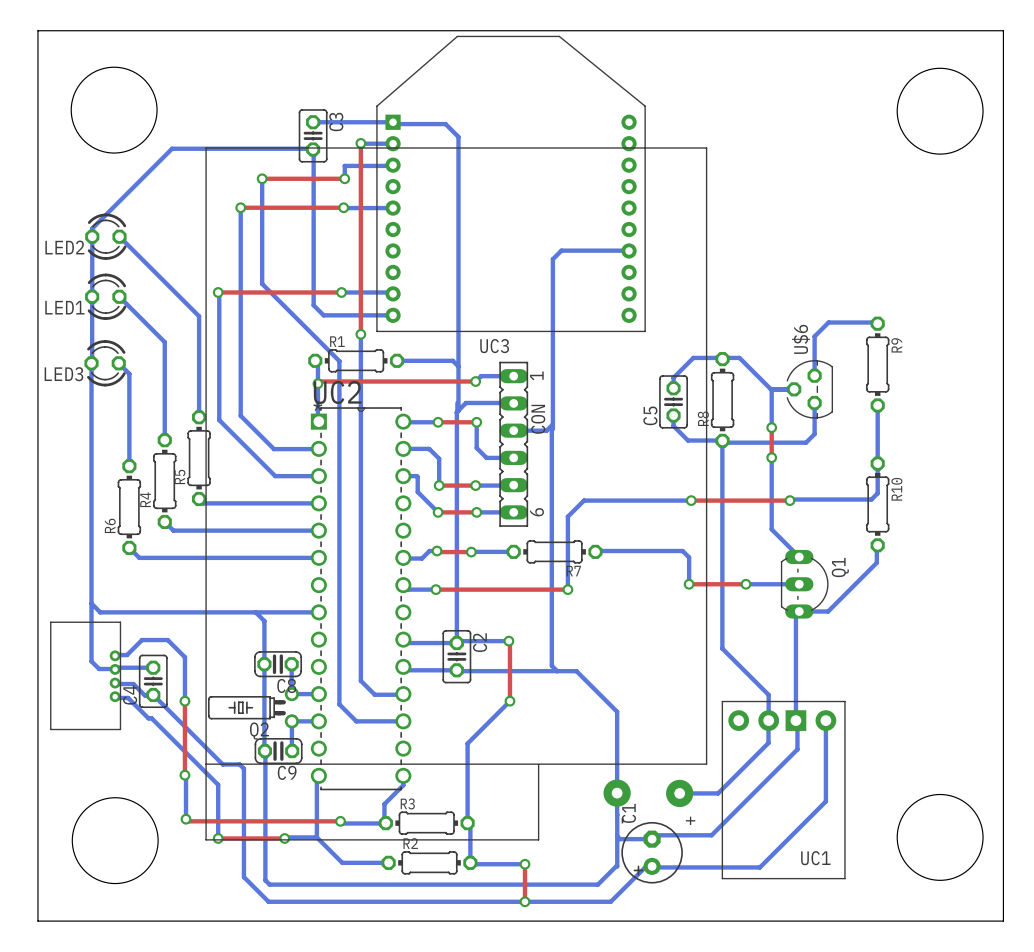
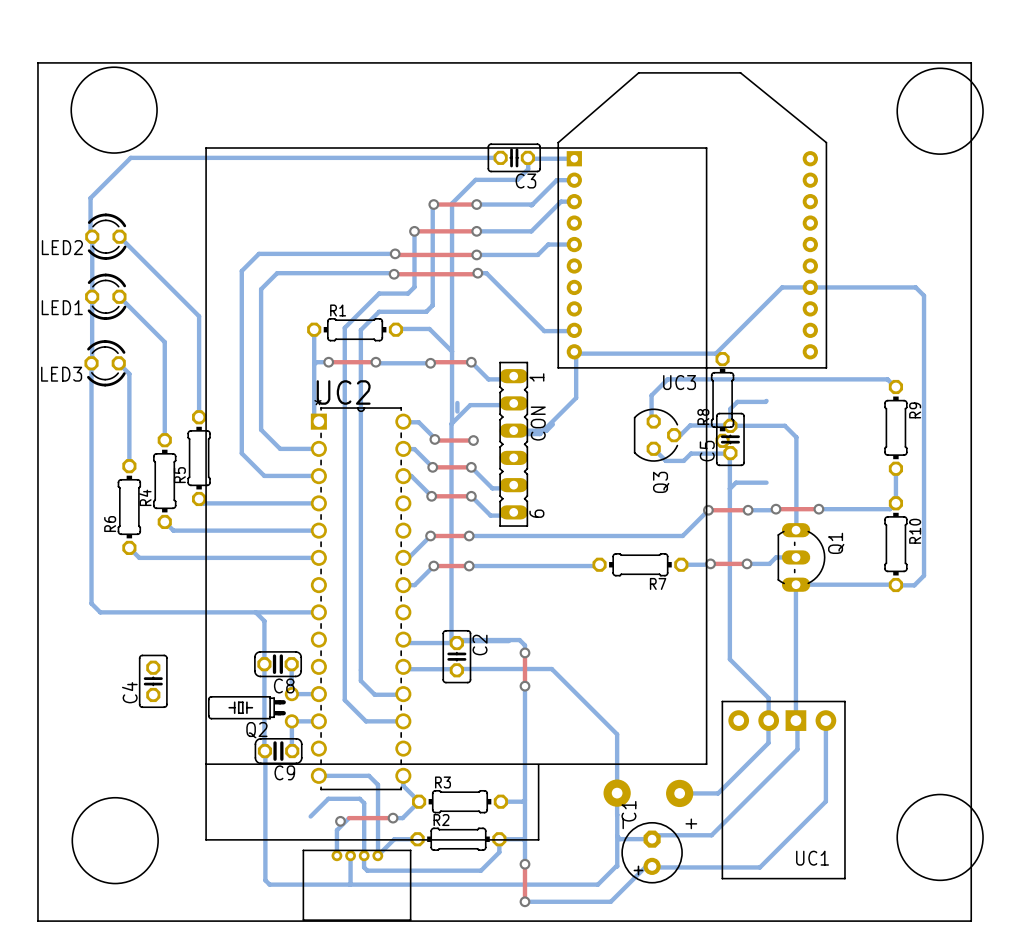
board edge: (37, 62) (37, 30) (1003, 30) (1003, 921) (971, 921) -> (37, 62) (971, 62) (971, 921)
bottom track: (313, 122) (445, 124) (458, 136) (458, 411) (456, 412) -> none
C3 rotation: 0° (313, 135) -> 90° clockwise (514, 157)
C3 position: (313, 135) -> (514, 157)
bottom track: (360, 143) (393, 143) -> none
top track: (360, 143) (360, 334) -> none
via: (360, 143) -> none
bottom track: (307, 148) (313, 155) (313, 305) (323, 315) (393, 315) -> none
bottom track: (313, 149) (172, 148) (92, 228) (92, 236) -> (500, 157) (130, 157) (90, 198) (90, 234) (92, 236)
bottom track: none -> (527, 158) (574, 158)
bottom track: none -> (528, 158) (528, 169) (517, 179) (475, 179) (452, 203) (452, 423)
bottom track: (393, 165) (344, 165) (344, 178) -> none
bottom track: (262, 178) (262, 283) (339, 361) (339, 704) (356, 721) (366, 721) -> (414, 231) (414, 287) (408, 293) (379, 293) (344, 327) (344, 700) (366, 721)
top track: (262, 178) (344, 178) -> none
via: (262, 178) -> none
via: (344, 178) -> none
bottom track: none -> (574, 180) (556, 180) (531, 205)
UC3 position: (511, 183) -> (692, 220)
bottom track: none -> (574, 201) (561, 201) (531, 231) (476, 231)
top track: none -> (433, 204) (476, 204)
via: none -> (433, 204)
bottom track: none -> (476, 204) (532, 204)
via: none -> (476, 204)
bottom track: none -> (434, 205) (432, 205) (432, 305) (426, 311) (379, 311) (360, 330) (360, 334)
bottom track: (240, 207) (240, 415) (273, 449) (318, 448) -> (394, 274) (277, 273) (261, 289) (261, 429) (280, 448) (318, 448)
top track: (240, 207) (343, 207) -> none
via: (240, 207) -> none
bottom track: (343, 207) (393, 208) -> none
via: (343, 207) -> none
top track: none -> (414, 231) (476, 231)
via: none -> (414, 231)
via: none -> (476, 231)
bottom track: none -> (574, 244) (548, 244) (537, 254) (476, 254)
bottom track: (629, 250) (561, 250) (552, 259) (551, 665) (557, 671) -> none
top track: none -> (395, 253) (476, 254)
via: none -> (395, 253)
via: none -> (476, 254)
bottom track: none -> (477, 273) (486, 273) (544, 331) (574, 330)
top track: none -> (477, 273) (394, 274)
via: none -> (477, 273)
via: none -> (394, 274)
bottom track: (218, 292) (219, 420) (275, 476) (318, 476) -> (395, 253) (258, 253) (241, 271) (241, 453) (264, 475) (318, 476)
top track: (218, 292) (341, 292) -> none
via: (218, 292) -> none
bottom track: (341, 292) (393, 293) -> none
via: (341, 292) -> none
bottom track: (877, 323) (828, 322) (814, 336) (814, 375) -> none
bottom track: none -> (395, 329) (429, 328) (452, 351)
via: (360, 334) -> none
bottom track: none -> (576, 353) (715, 353) (782, 287) (915, 287) (924, 295) (924, 575) (914, 585) (796, 584)
bottom track: none -> (576, 353) (576, 397) (540, 434) (511, 433)
bottom track: (315, 360) (317, 363) (317, 420) -> (314, 329) (314, 416) (317, 420)
R1 position: (356, 360) -> (355, 329)
bottom track: (397, 360) (452, 360) (458, 366) -> none
bottom track: none -> (328, 362) (316, 362) (314, 364)
top track: none -> (328, 362) (375, 362)
via: none -> (328, 362)
bottom track: none -> (375, 362) (430, 363)
via: none -> (375, 362)
bottom track: none -> (471, 362) (488, 379) (511, 379)
top track: none -> (471, 362) (430, 363)
via: none -> (430, 363)
R9 position: (877, 364) -> (895, 427)
bottom track: (513, 376) (481, 376) (475, 381) -> none
top track: (475, 381) (320, 381) (317, 383) -> none
via position: (475, 381) -> (471, 362)
via: (317, 383) -> none
bottom track: none -> (895, 386) (887, 379) (667, 379) (651, 395) (651, 419) (653, 421)
bottom track: (673, 388) (673, 377) (693, 357) (739, 357) (770, 389) (794, 389) -> none
bottom track: (772, 389) (771, 427) -> none
U$6: (809, 389) -> none
bottom track: none -> (766, 400) (737, 401) (730, 408) (730, 425)
C5 position: (673, 401) -> (730, 439)
bottom track: (814, 402) (814, 434) (806, 442) (688, 440) (673, 426) (673, 415) -> none
bottom track: (513, 403) (465, 402) (456, 412) (456, 643) -> none
bottom track: (877, 405) (877, 493) (871, 499) (789, 500) -> none
bottom track: none -> (511, 406) (470, 405) (451, 423) (451, 641) (453, 640) (519, 640) (524, 645) (524, 652)
bottom track: (418, 422) (438, 422) -> (418, 422) (434, 439)
top track: (438, 422) (476, 422) -> (432, 467) (471, 467)
via position: (438, 422) -> (434, 439)
bottom track: (476, 422) (476, 448) (486, 457) (513, 457) -> none
via position: (476, 422) -> (473, 440)
bottom track: none -> (730, 425) (690, 425) (680, 435) (674, 435)
bottom track: none -> (730, 425) (784, 425) (796, 437) (796, 530)
top track: (771, 427) (771, 457) -> none
via: (771, 427) -> none
Q3: none -> (657, 435)
top track: none -> (434, 439) (473, 440)
bottom track: (722, 440) (722, 648) (768, 694) (768, 698) -> (729, 453) (729, 659) (768, 698)
bottom track: (403, 448) (429, 449) (439, 458) (439, 485) -> (403, 448) (414, 449) (432, 467)
bottom track: none -> (653, 448) (665, 460) (683, 460) (691, 453) (729, 453)
bottom track: (771, 457) (771, 529) (799, 557) -> none
via: (771, 457) -> none
via: none -> (432, 467)
bottom track: none -> (471, 467) (492, 488) (511, 488)
via: none -> (471, 467)
bottom track: none -> (895, 468) (895, 503) (890, 509) (818, 509)
bottom track: (403, 476) (417, 476) (417, 492) (438, 512) -> (403, 476) (411, 475) (431, 496)
bottom track: none -> (766, 482) (735, 482) (729, 488)
top track: (439, 485) (475, 485) -> none
via: (439, 485) -> none
via: (475, 485) -> none
bottom track: (513, 485) (475, 485) -> none
top track: none -> (431, 496) (471, 496)
via: none -> (431, 496)
bottom track: none -> (471, 496) (490, 515) (511, 515)
via: none -> (471, 496)
bottom track: (691, 500) (583, 500) (567, 516) (567, 589) -> none
top track: (691, 500) (789, 500) -> none
via position: (691, 500) -> (708, 510)
via: (789, 500) -> none
R10 position: (877, 504) -> (895, 544)
bottom track: none -> (776, 509) (748, 510)
top track: none -> (776, 509) (818, 509)
via: none -> (776, 509)
via: none -> (818, 509)
bottom track: none -> (708, 510) (682, 535) (469, 535)
top track: none -> (708, 510) (748, 510)
via: none -> (748, 510)
top track: (438, 512) (476, 512) -> (430, 535) (469, 535)
via: (438, 512) -> none
bottom track: (476, 512) (513, 512) -> none
via: (476, 512) -> none
via: none -> (430, 535)
via: none -> (469, 535)
bottom track: (877, 545) (876, 562) (828, 611) (799, 611) (795, 614) -> (795, 584) (795, 614)
bottom track: (437, 551) (429, 551) (422, 558) (403, 557) -> (430, 535) (408, 557) (403, 557)
top track: (437, 551) (471, 552) -> none
via: (437, 551) -> none
bottom track: (513, 551) (471, 552) -> none
R7 position: (554, 551) -> (640, 564)
bottom track: (595, 551) (682, 551) (689, 557) (689, 584) -> none
via: (471, 552) -> none
bottom track: none -> (796, 557) (776, 557) (769, 563) (747, 563)
bottom track: none -> (710, 563) (681, 564)
top track: none -> (710, 563) (747, 563)
via: none -> (710, 563)
via: none -> (747, 563)
bottom track: none -> (599, 564) (469, 566)
top track: none -> (433, 566) (469, 566)
via: none -> (433, 566)
via: none -> (469, 566)
top track: (689, 584) (745, 584) -> none
via: (689, 584) -> none
bottom track: (745, 584) (799, 584) -> none
via: (745, 584) -> none
Q1 position: (804, 584) -> (801, 557)
bottom track: (403, 585) (407, 589) (435, 589) -> (403, 585) (414, 585) (433, 566)
top track: (435, 589) (567, 589) -> none
via: (435, 589) -> none
via: (567, 589) -> none
bottom track: (91, 603) (91, 661) (99, 669) (153, 667) -> none
top track: (508, 641) (509, 701) -> none
via position: (508, 641) -> (524, 652)
top track: none -> (524, 652) (524, 686)
bottom track: (115, 655) (127, 655) (142, 640) (167, 640) (184, 657) (184, 701) -> none
bottom track: (405, 669) (576, 671) (617, 711) (617, 734) -> (405, 669) (551, 669) (617, 734)
part: (85, 675) -> none
bottom track: (115, 683) (133, 684) (144, 695) (153, 694) (222, 764) (239, 764) (243, 768) (243, 877) (268, 901) (524, 901) -> none
bottom track: (115, 696) (128, 697) (148, 718) (151, 718) (218, 784) (218, 838) -> none
top track: (184, 701) (184, 775) -> none
via: (184, 701) -> none
bottom track: (509, 701) (467, 743) (467, 823) (470, 825) (470, 862) (524, 864) -> (524, 686) (524, 864)
via position: (509, 701) -> (524, 686)
bottom track: (184, 775) (186, 819) -> none
via: (184, 775) -> none
bottom track: (318, 775) (316, 777) (316, 837) -> (318, 775) (369, 775) (378, 784) (378, 855)
bottom track: (403, 785) (384, 804) (385, 823) (342, 823) (340, 821) -> (403, 785) (419, 801) (402, 818) (393, 818)
bottom track: none -> (524, 799) (523, 801) (500, 801)
bottom track: none -> (310, 816) (328, 798) (359, 798) (364, 803) (364, 855)
bottom track: none -> (349, 818) (336, 830) (336, 855)
top track: none -> (349, 818) (393, 818)
via: none -> (393, 818)
top track: (186, 819) (188, 821) (340, 821) -> none
via: (186, 819) -> none
R3 position: (426, 823) -> (459, 801)
bottom track: (316, 837) (342, 862) (388, 862) -> none
bottom track: (316, 837) (284, 838) -> none
top track: (218, 838) (284, 838) -> none
via: (218, 838) -> none
via: (284, 838) -> none
bottom track: none -> (417, 839) (394, 839) (377, 855)
bottom track: none -> (524, 840) (499, 839) (499, 852) (481, 870) (367, 870) (364, 867) (364, 855)
bottom track: none -> (350, 855) (350, 884)
R2 position: (429, 862) -> (458, 839)
part: none -> (357, 885)

